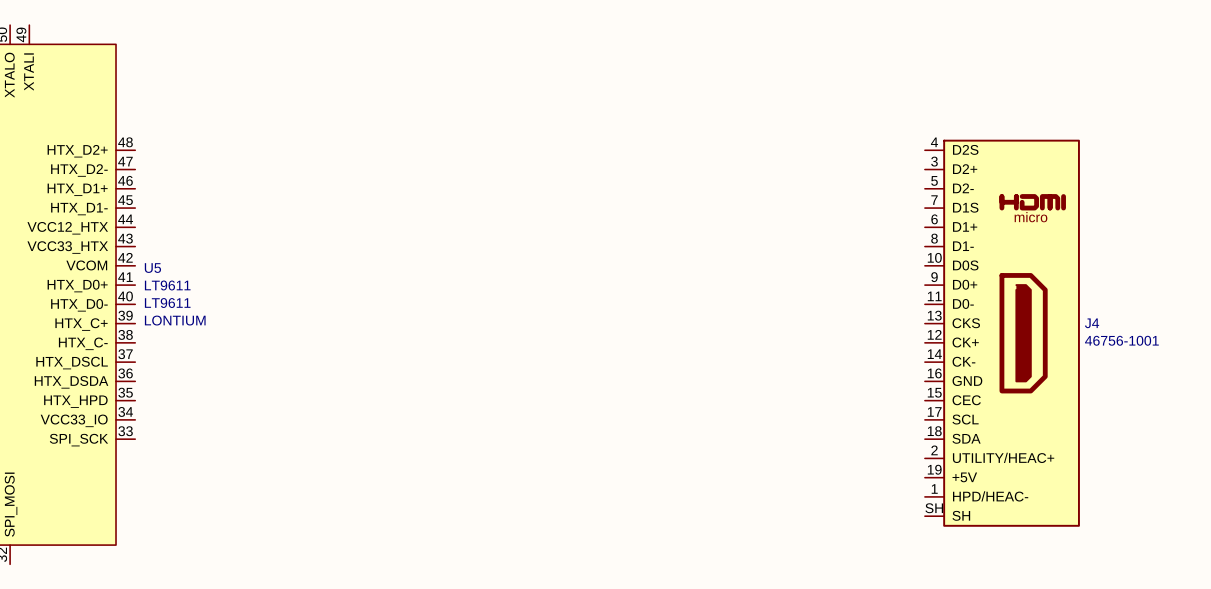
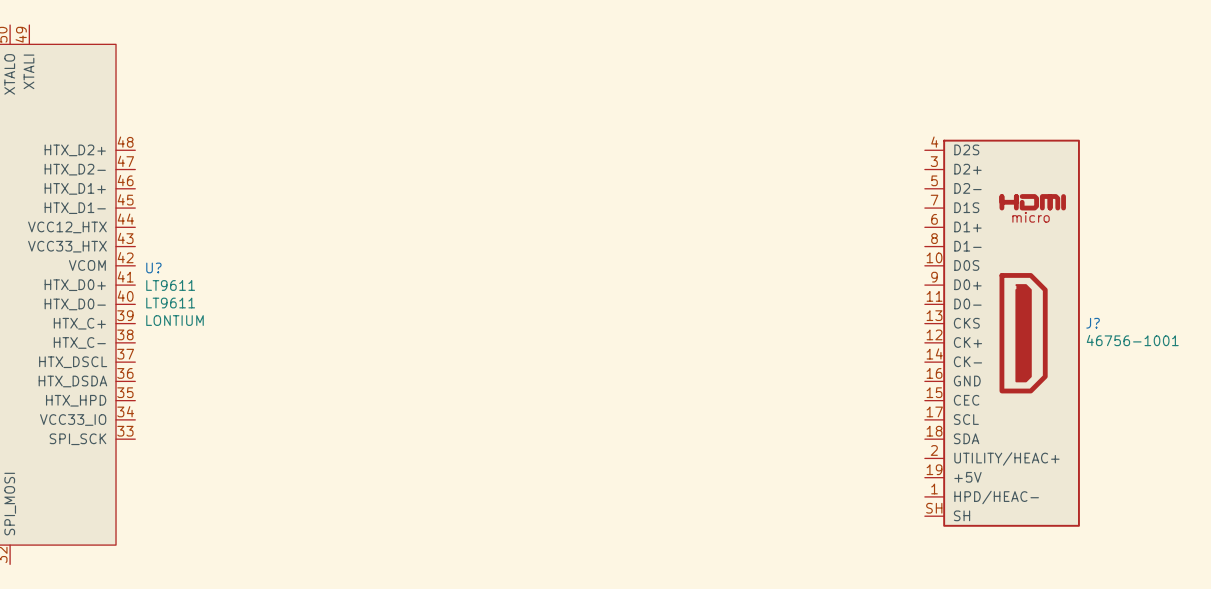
U5 name: U5 (152, 268) -> U? (153, 267)
J4 name: J4 (1092, 323) -> J? (1093, 323)

